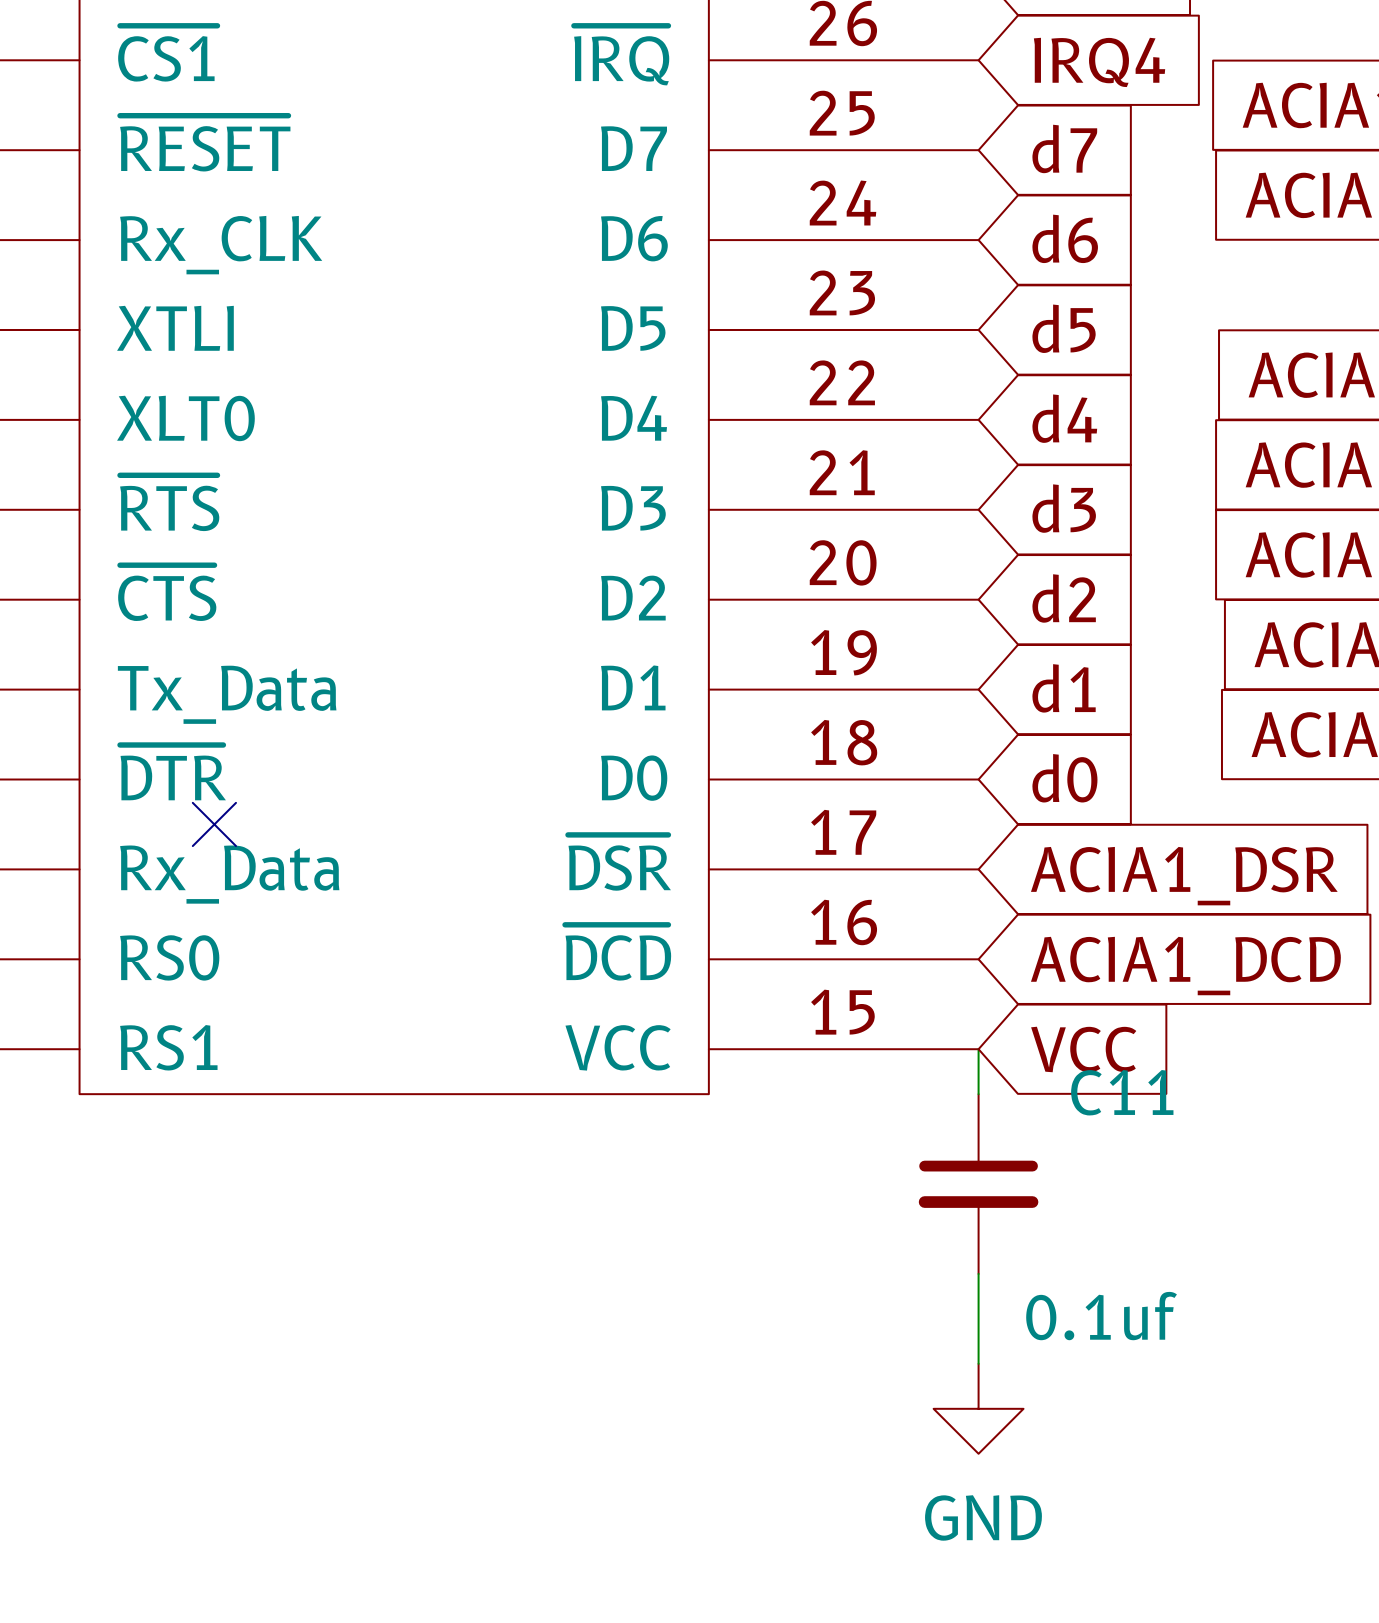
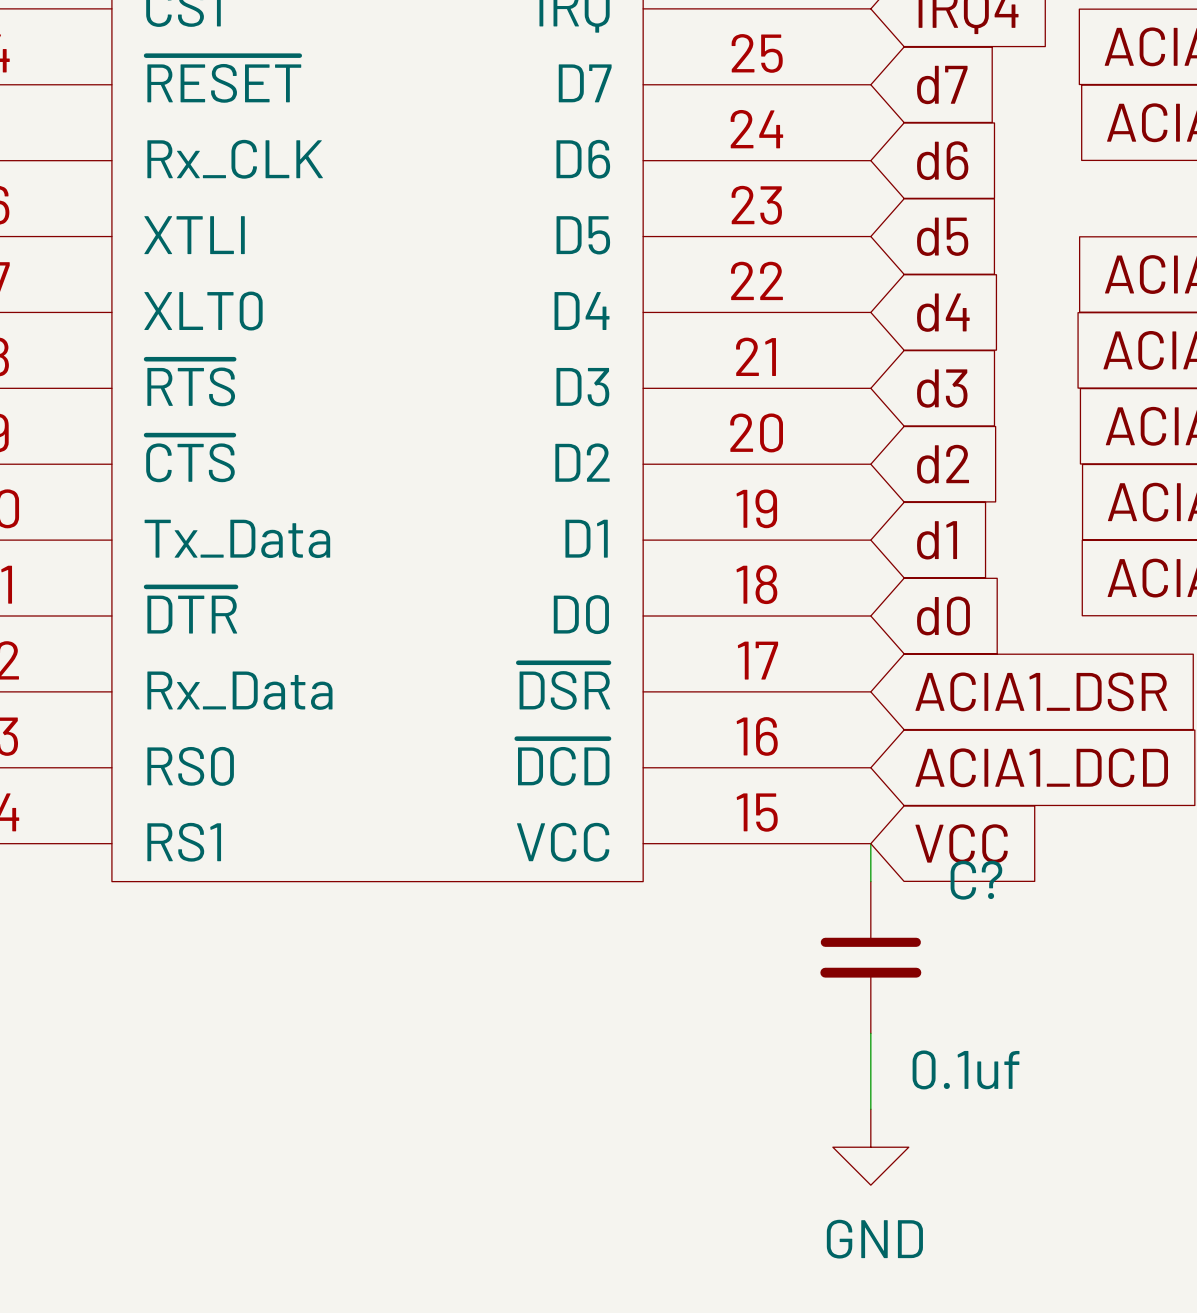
no-connect mark: (214, 824) -> none
C11 name: C11 (1122, 1092) -> C? (976, 880)

